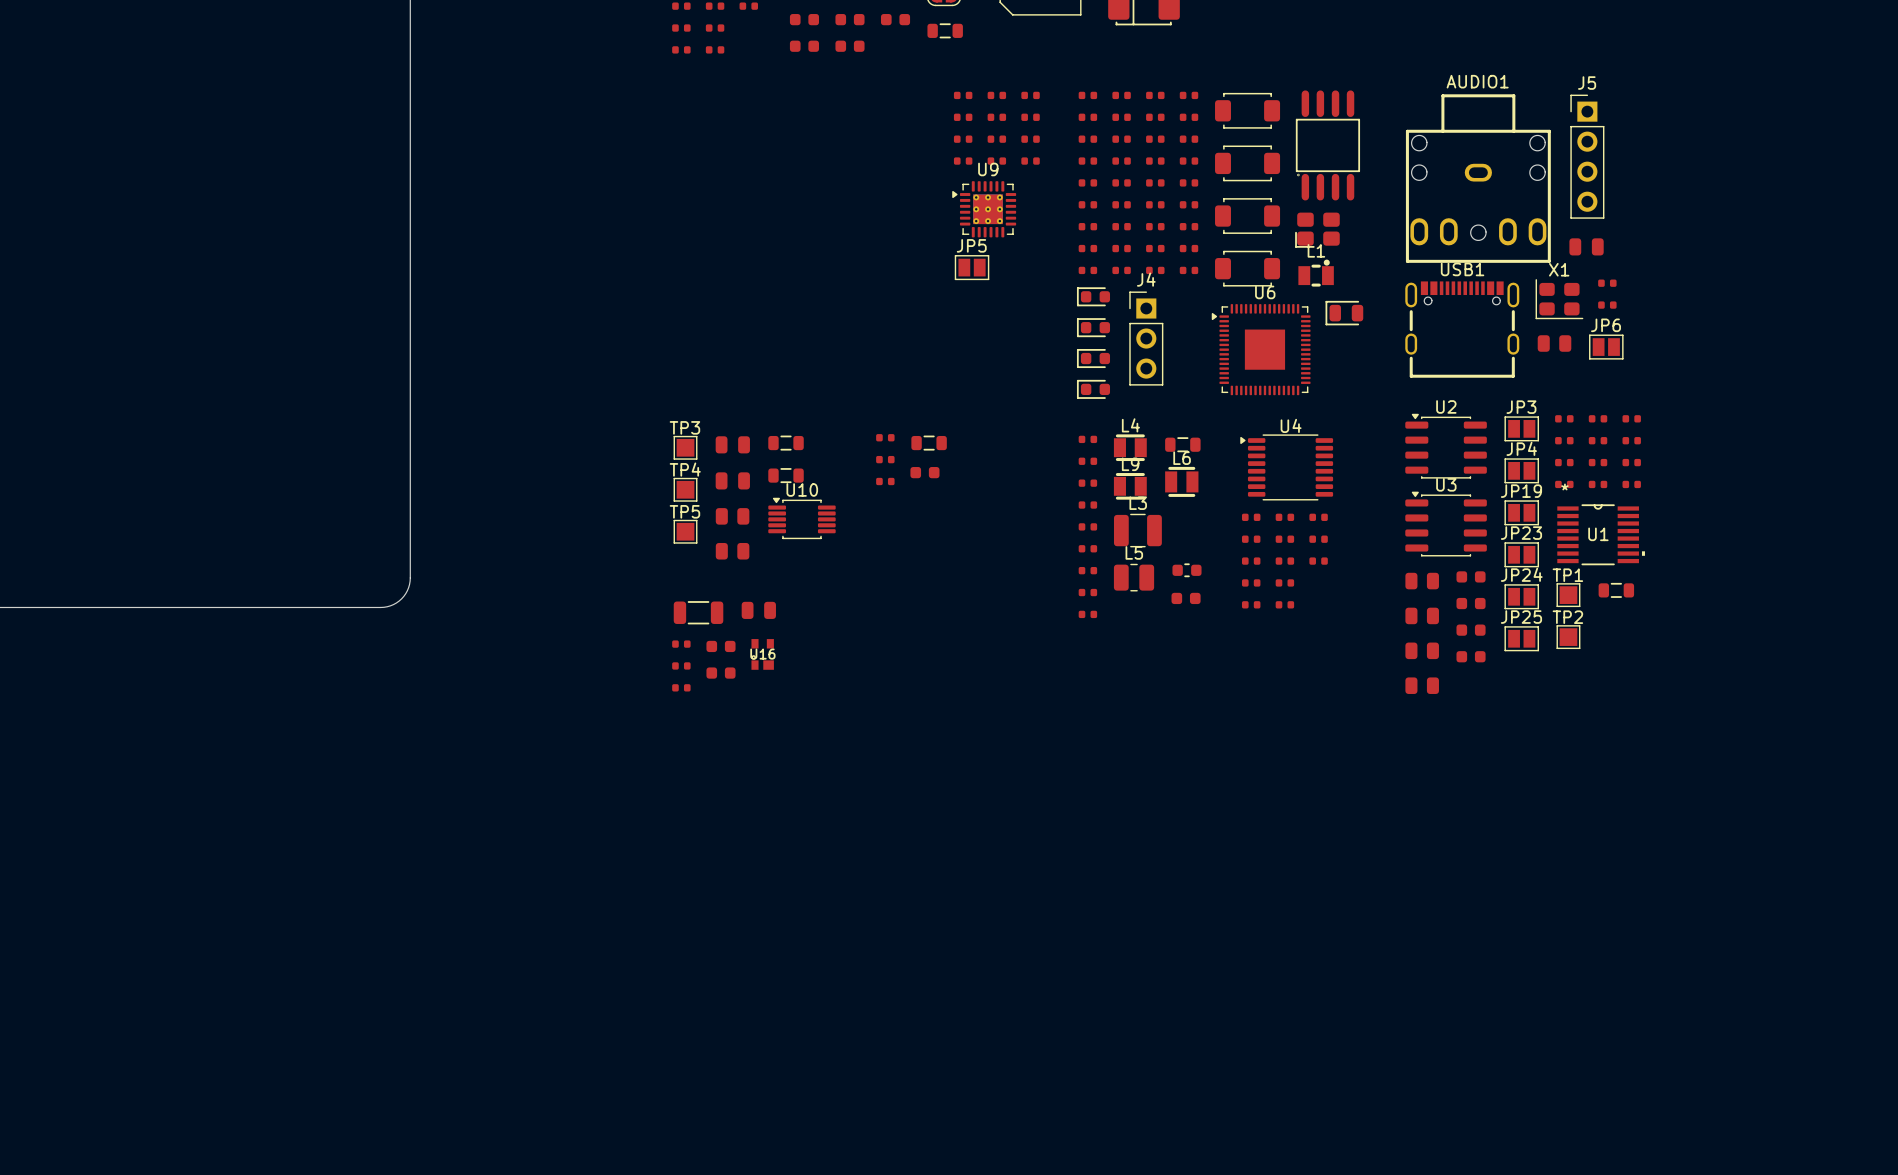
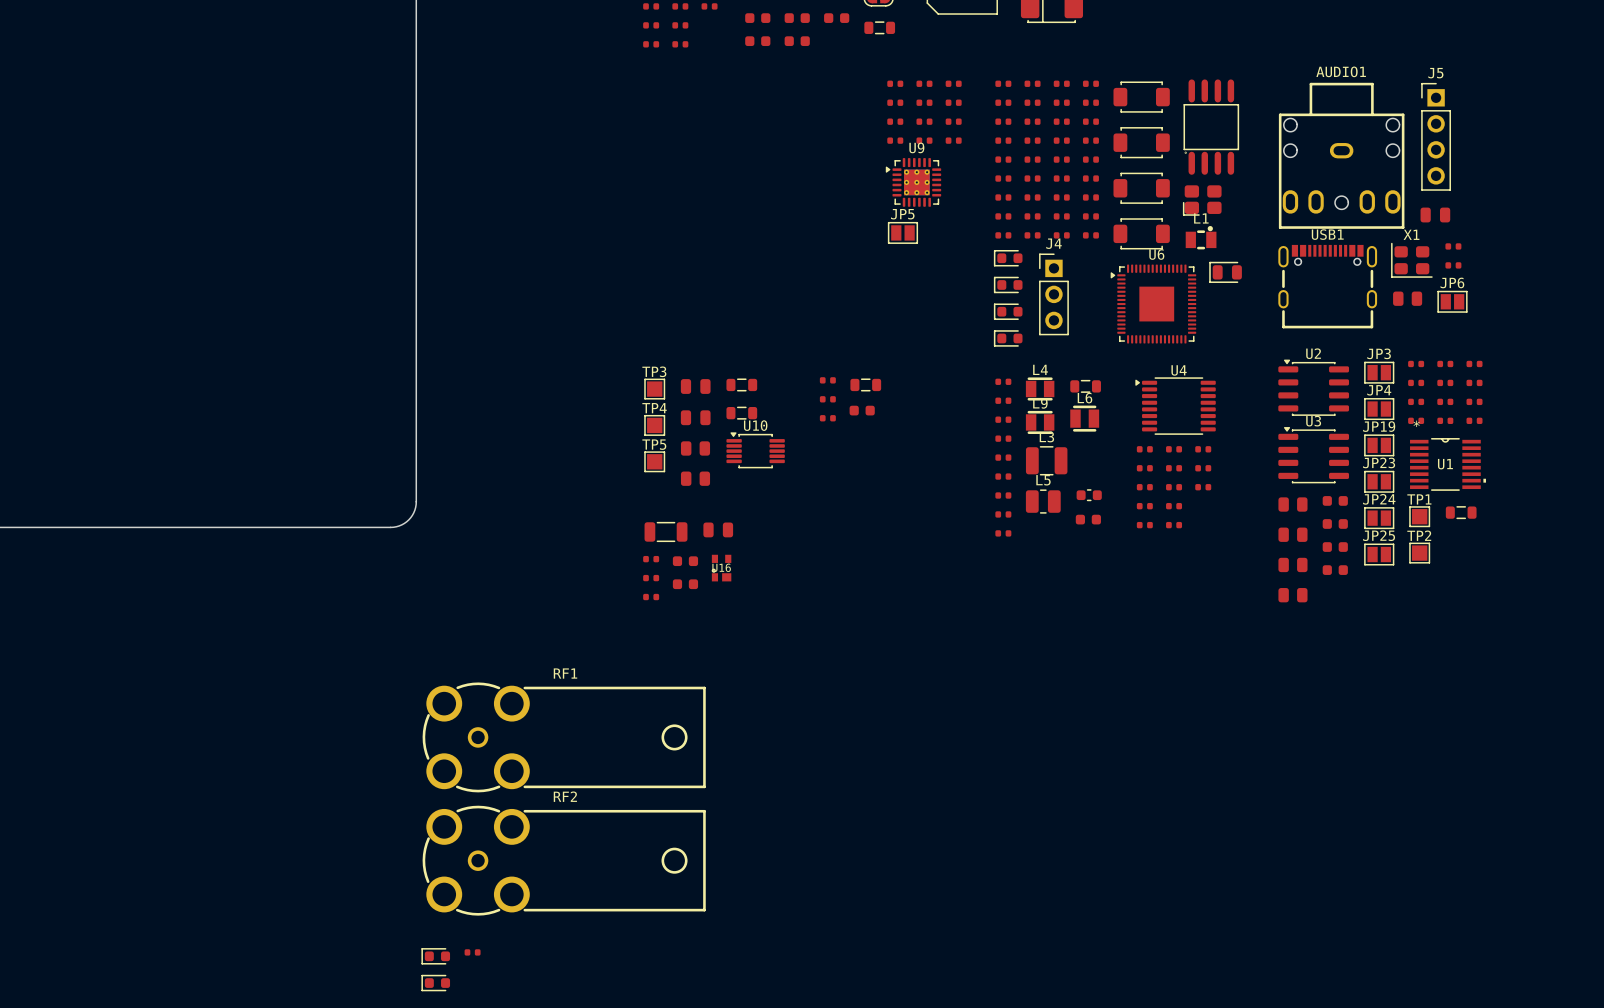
RF1: none -> (564, 737)
RF2: none -> (564, 860)
part: none -> (472, 952)
part: none -> (435, 956)
part: none -> (435, 983)

